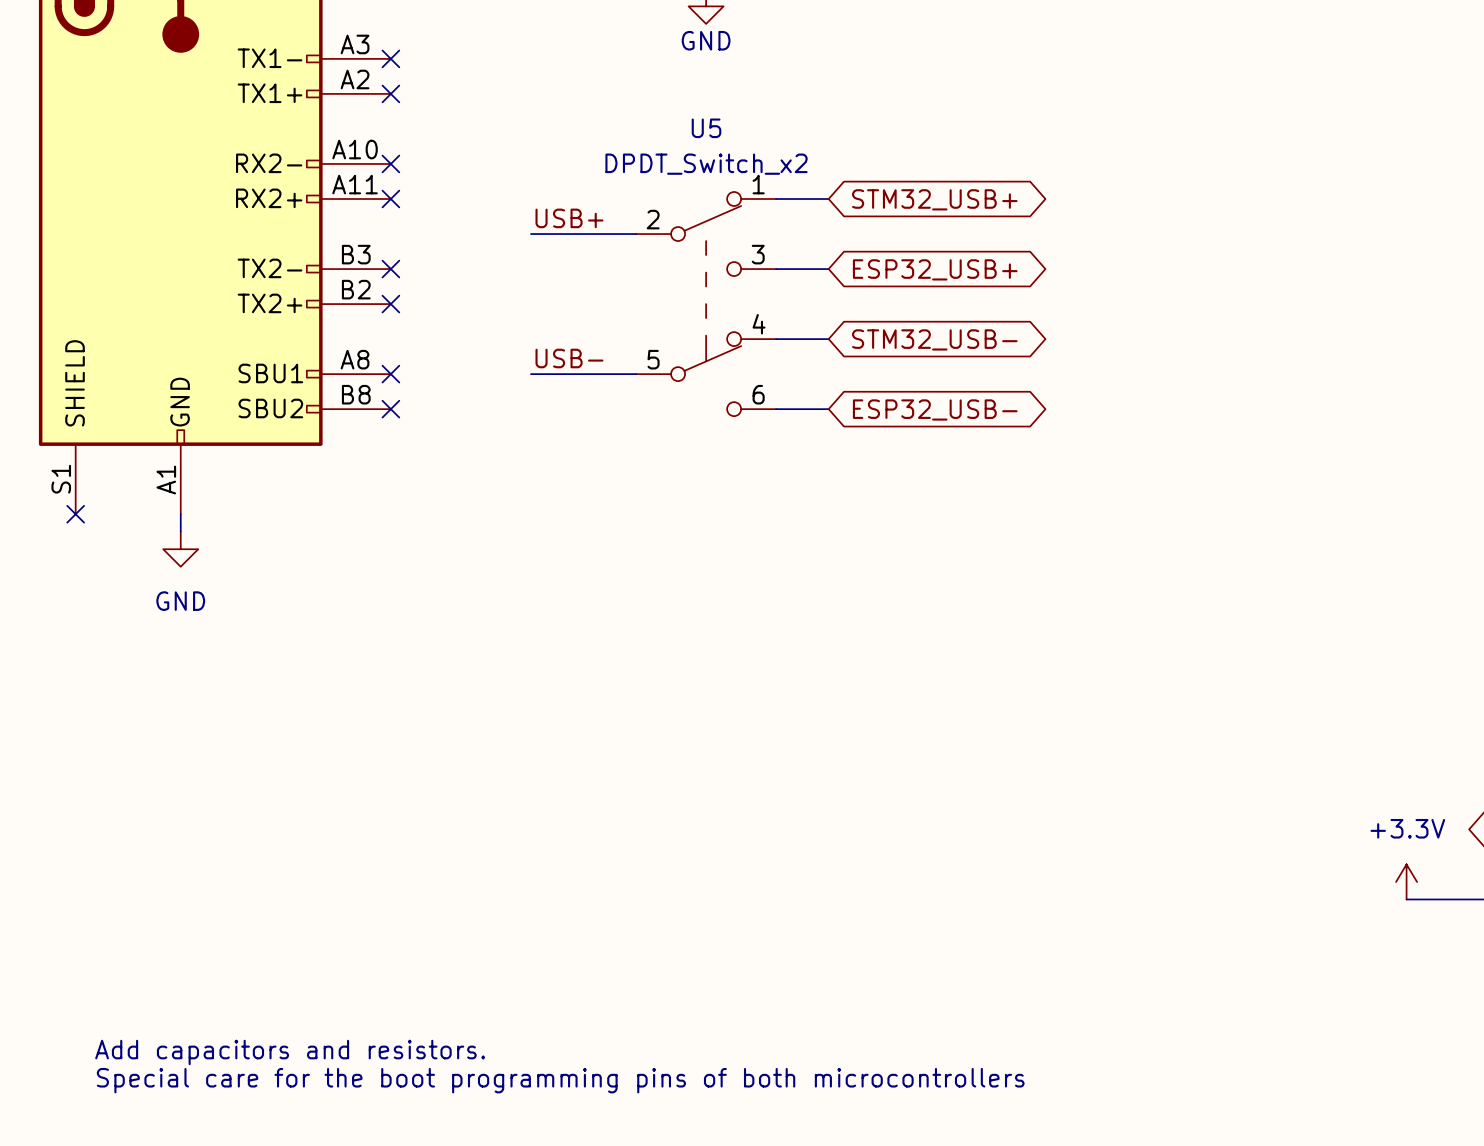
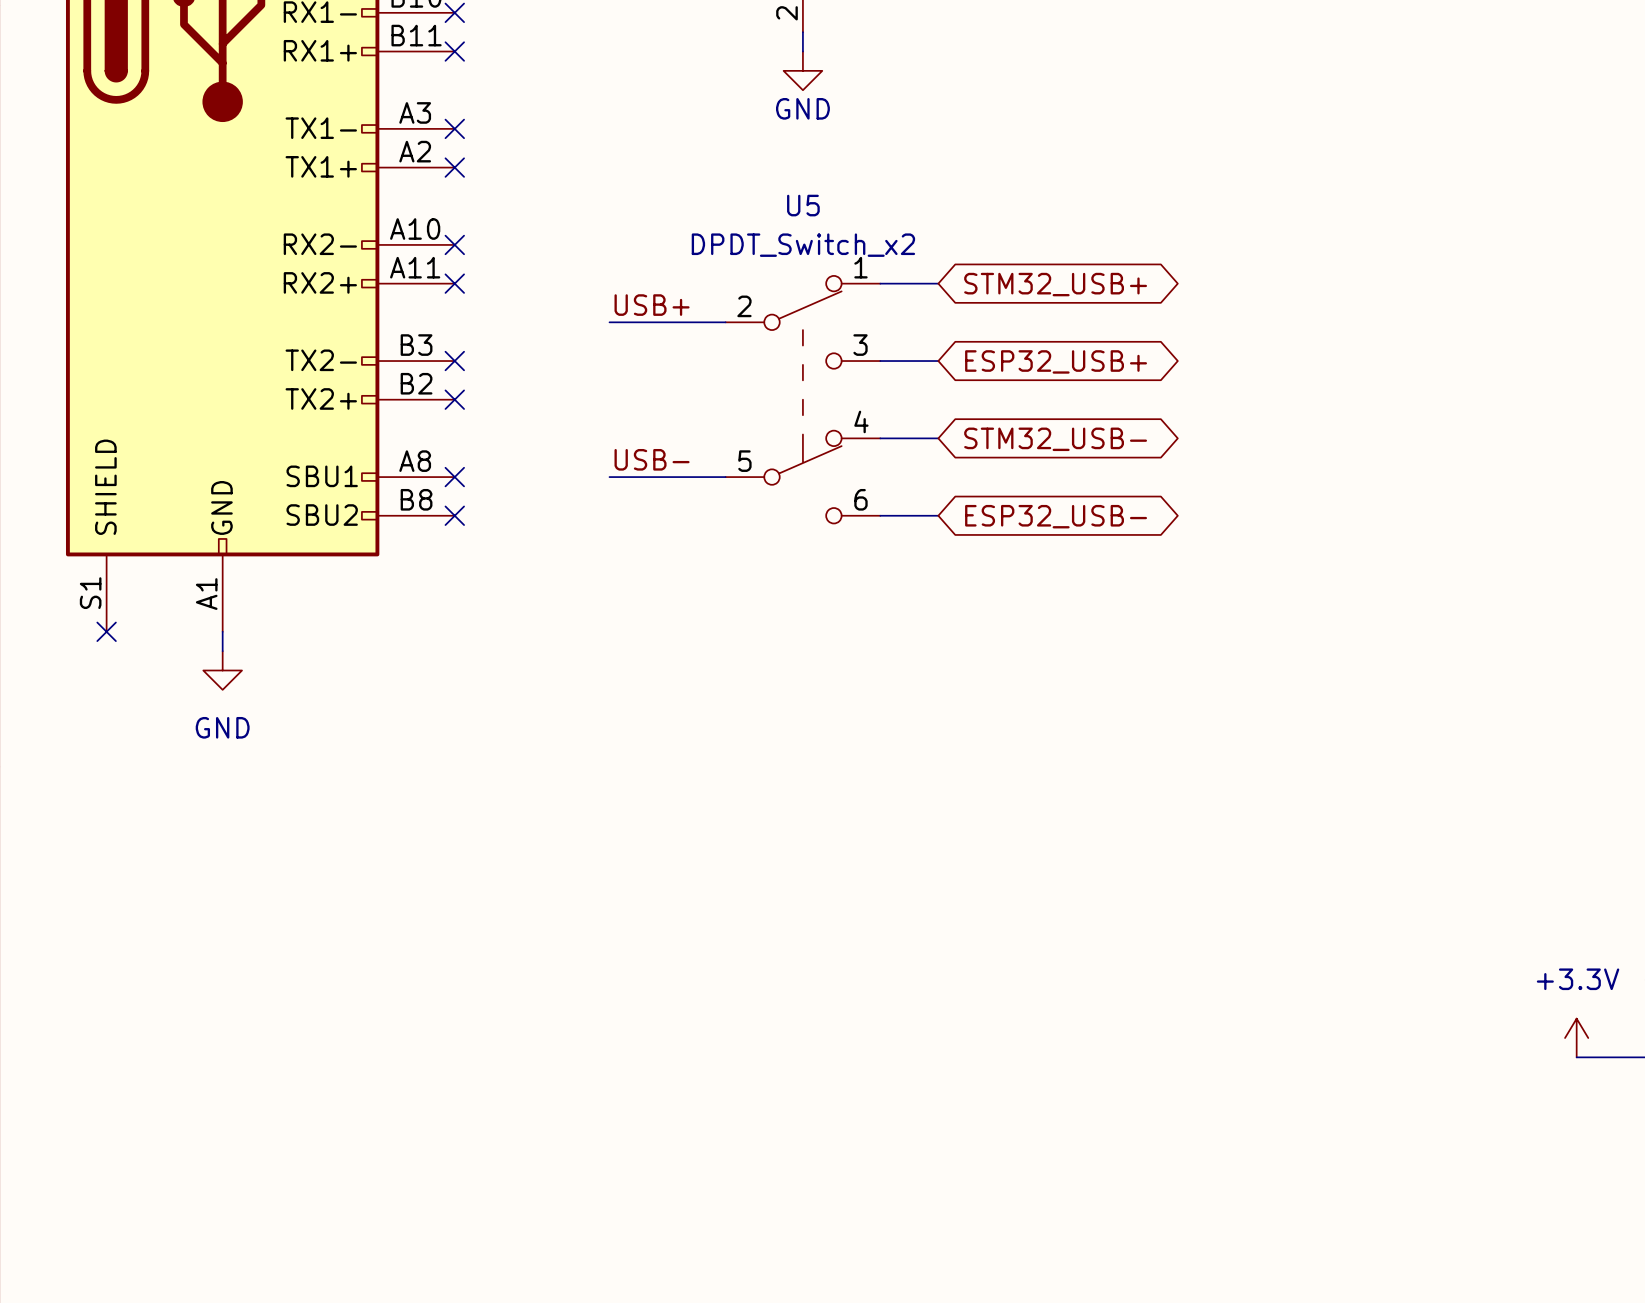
text: Add capacitors and resistors. (290, 1052) -> none
text: Special care for the boot programming pins of both microcontrollers (560, 1080) -> none

